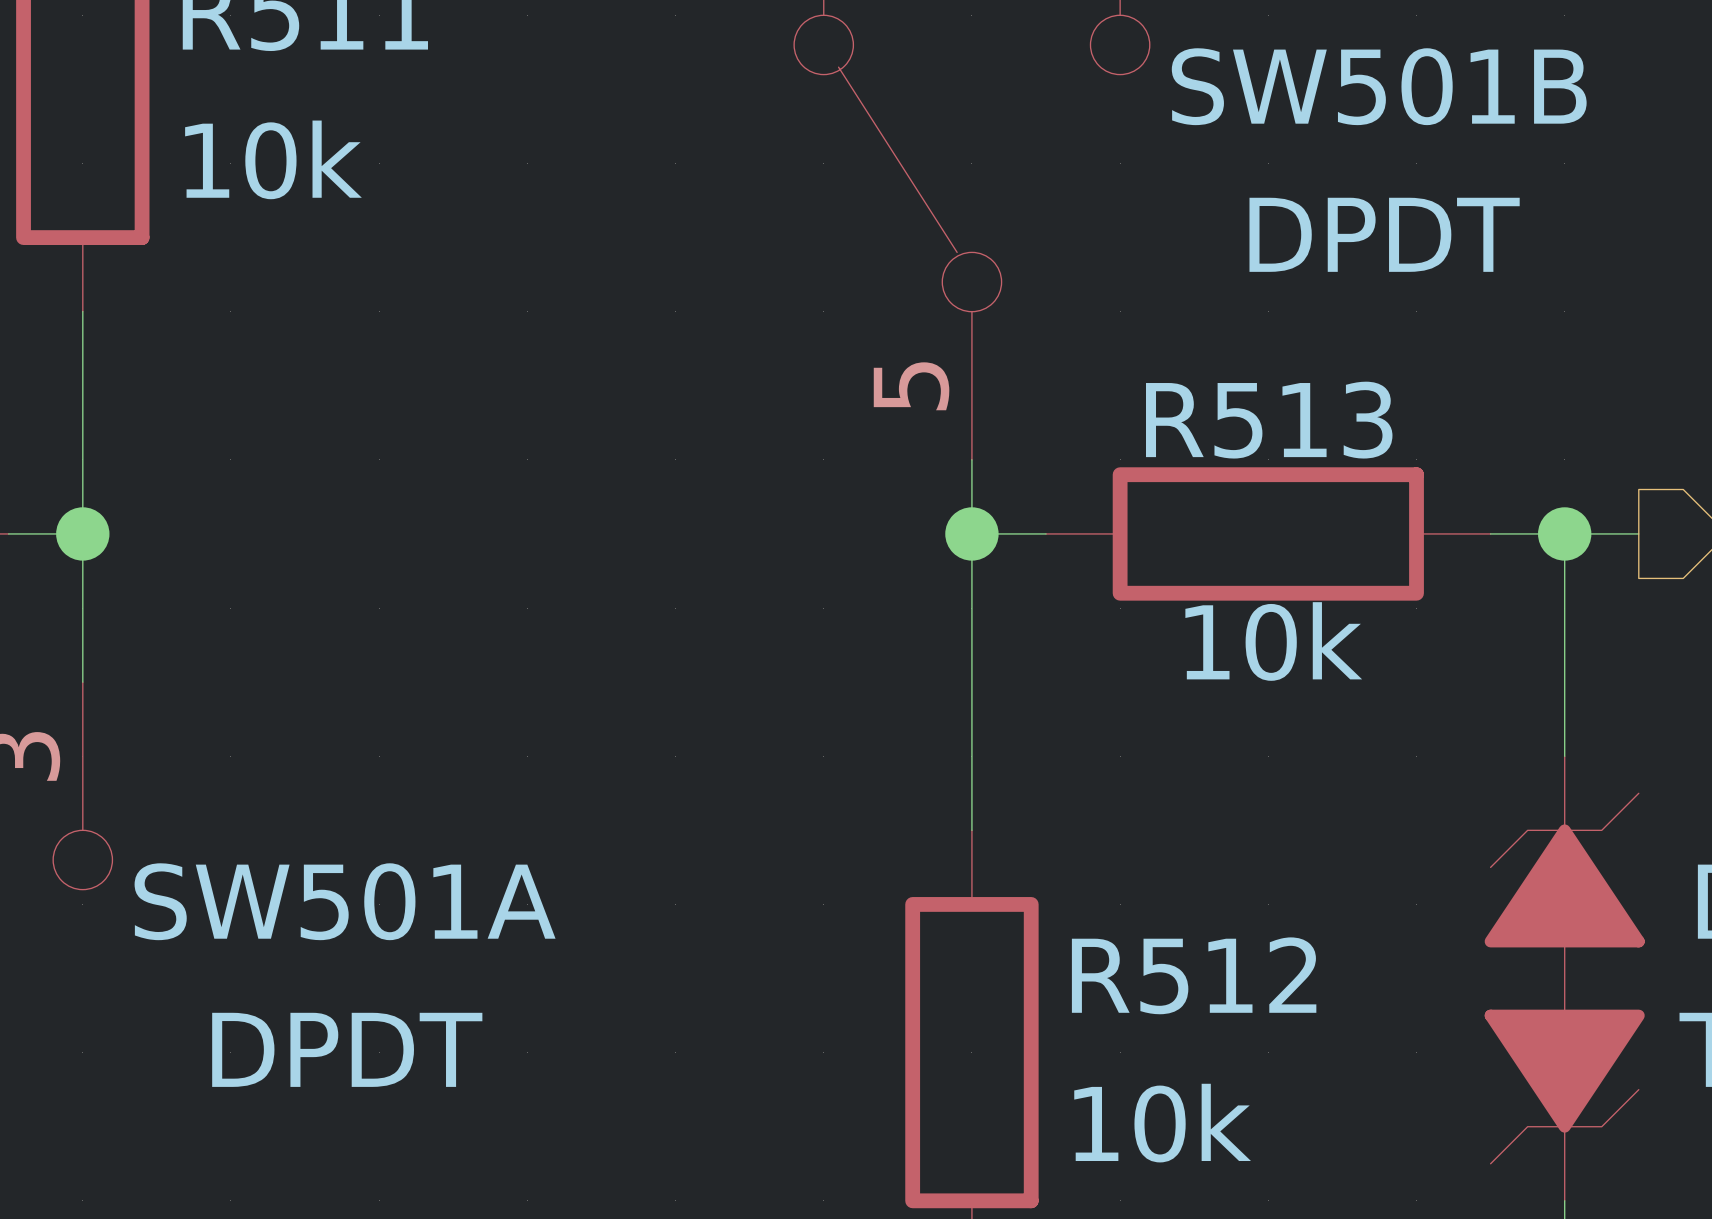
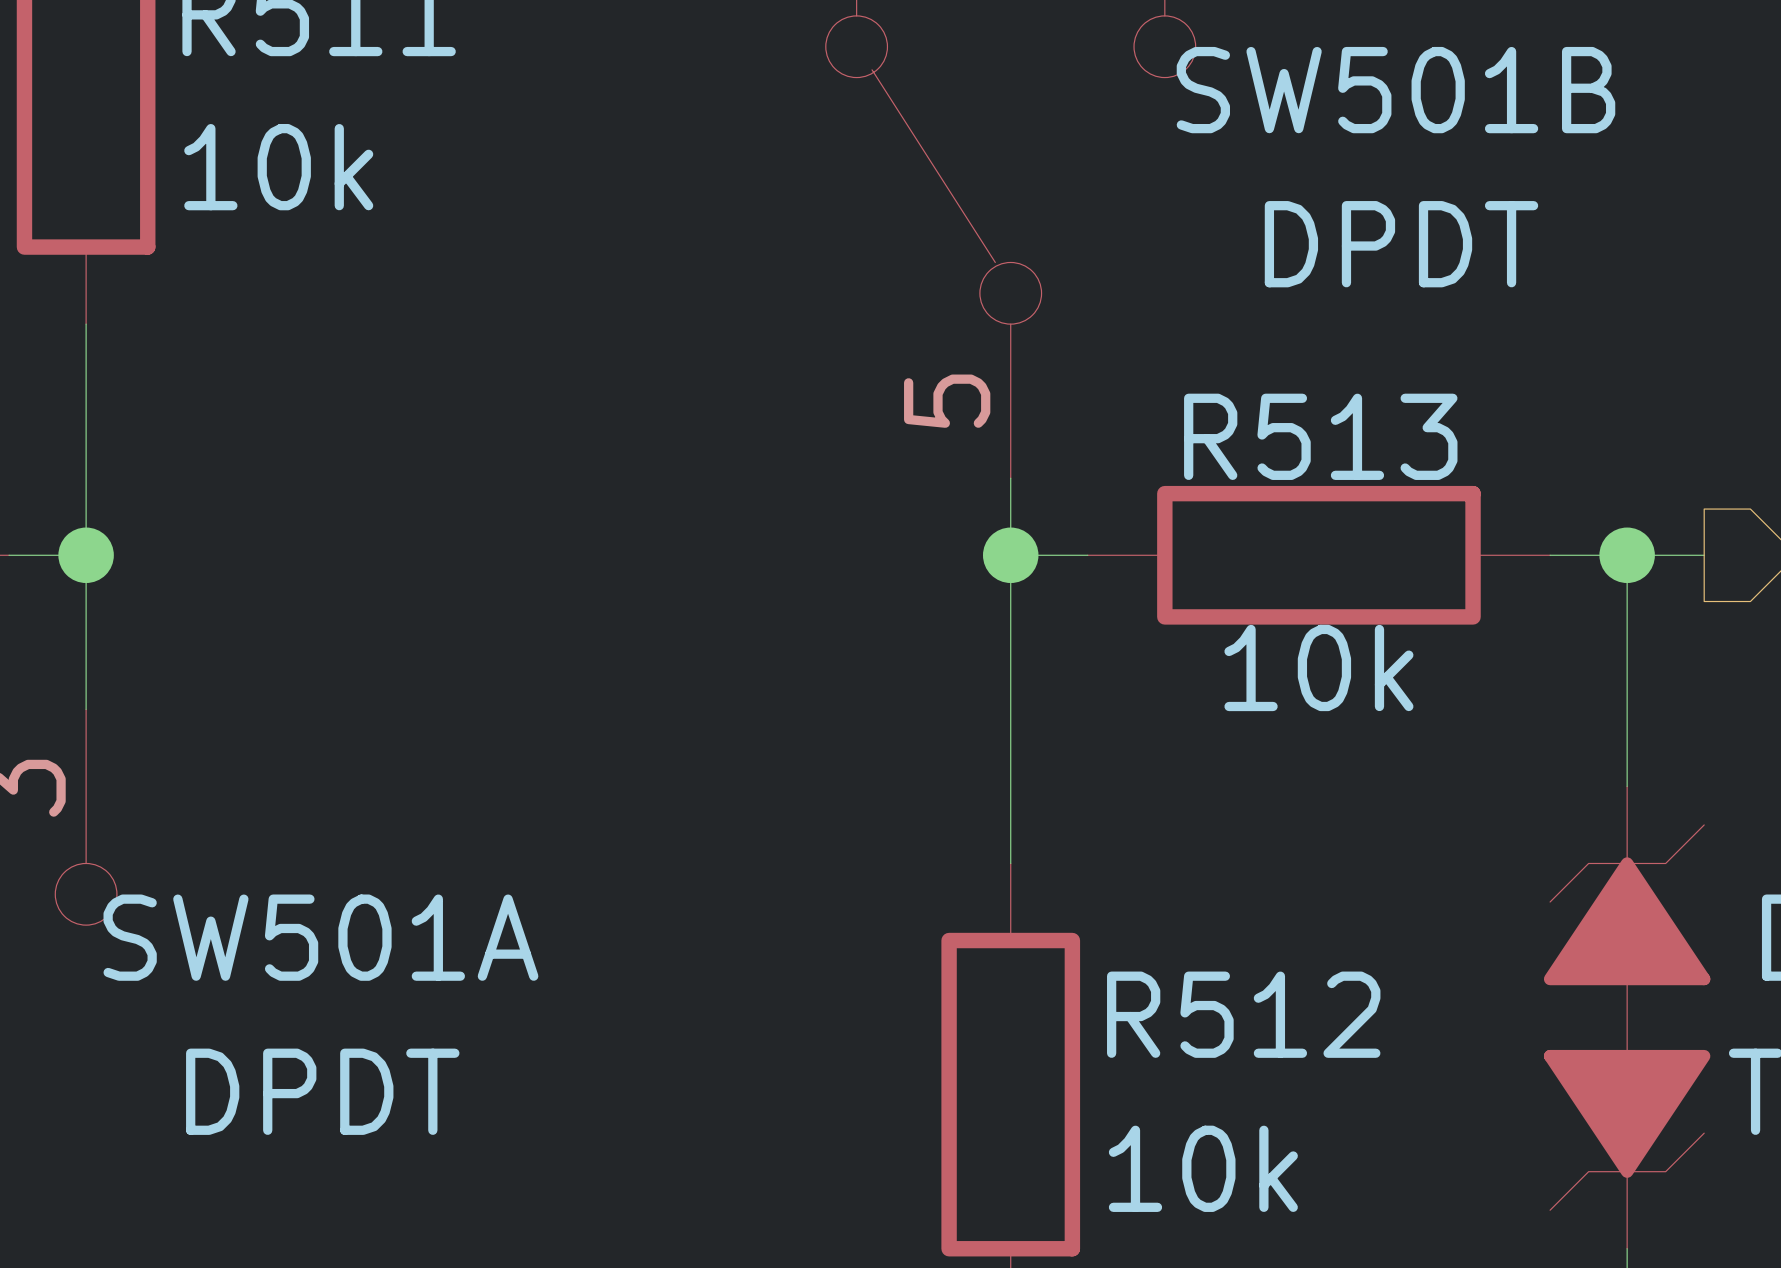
SW501B name position: SW501B (1379, 86) -> SW501B (1395, 90)
SW501B value position: DPDT (1384, 234) -> DPDT (1401, 244)
SW501A name position: SW501A (345, 901) -> SW501A (320, 937)
SW501A value position: DPDT (347, 1049) -> DPDT (322, 1091)

